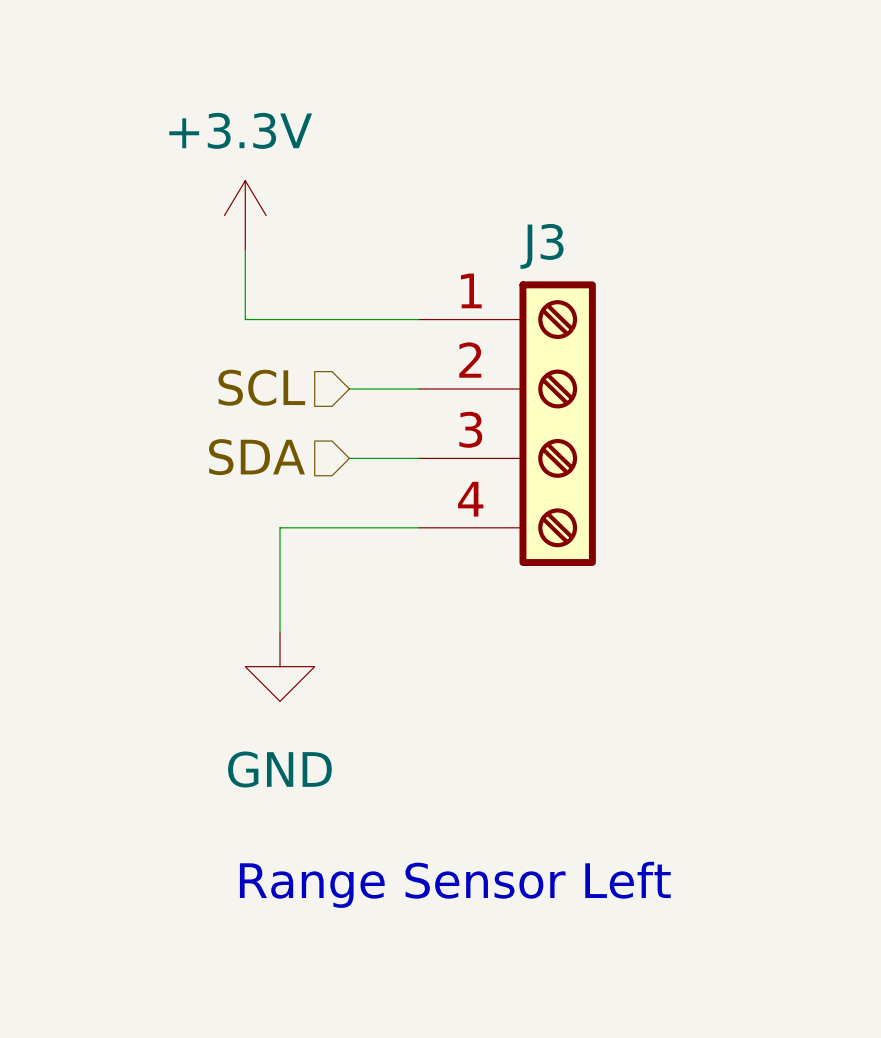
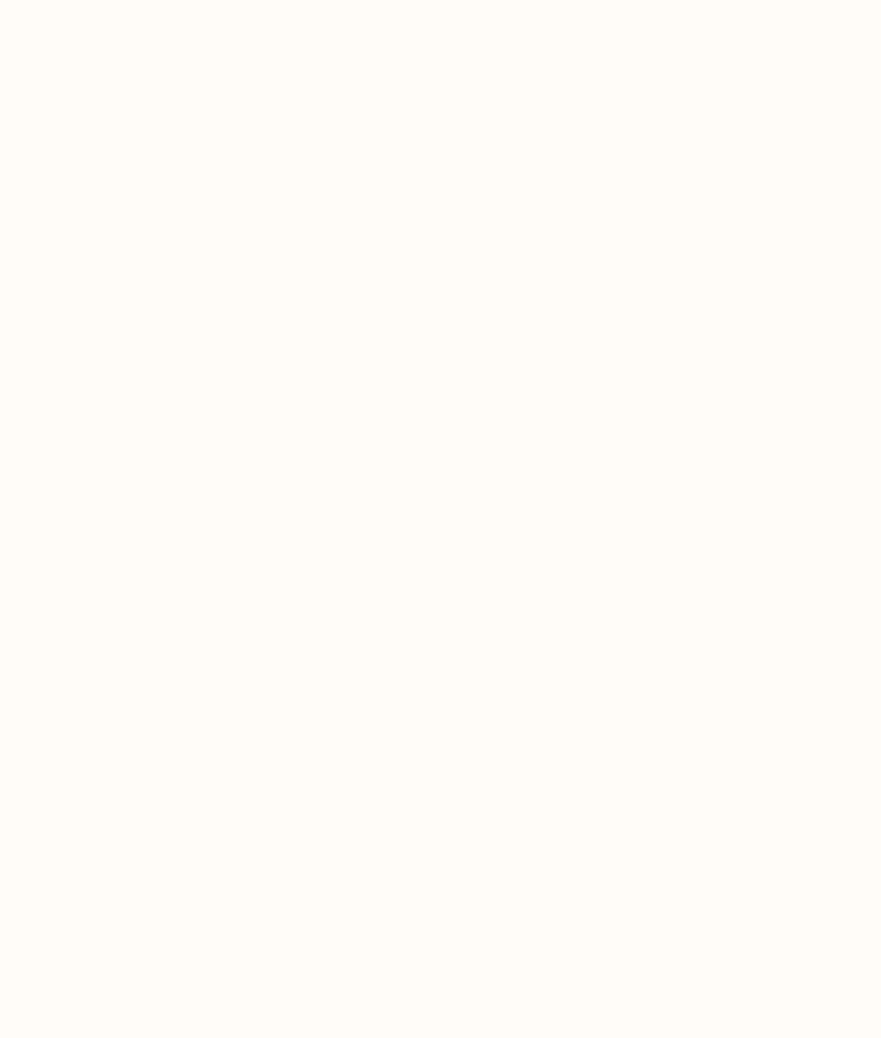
power symbol: +3.3V (245, 215) -> none
wire: (245, 250) (245, 319) (418, 319) -> none
hierarchical label: SCL (261, 387) -> none
wire: (349, 388) (418, 388) -> none
J3: (507, 423) -> none
hierarchical label: SDA (256, 457) -> none
wire: (349, 458) (418, 458) -> none
wire: (418, 527) (280, 527) (280, 631) -> none
power symbol: GND (280, 666) -> none
text: Range Sensor Left (455, 884) -> none

